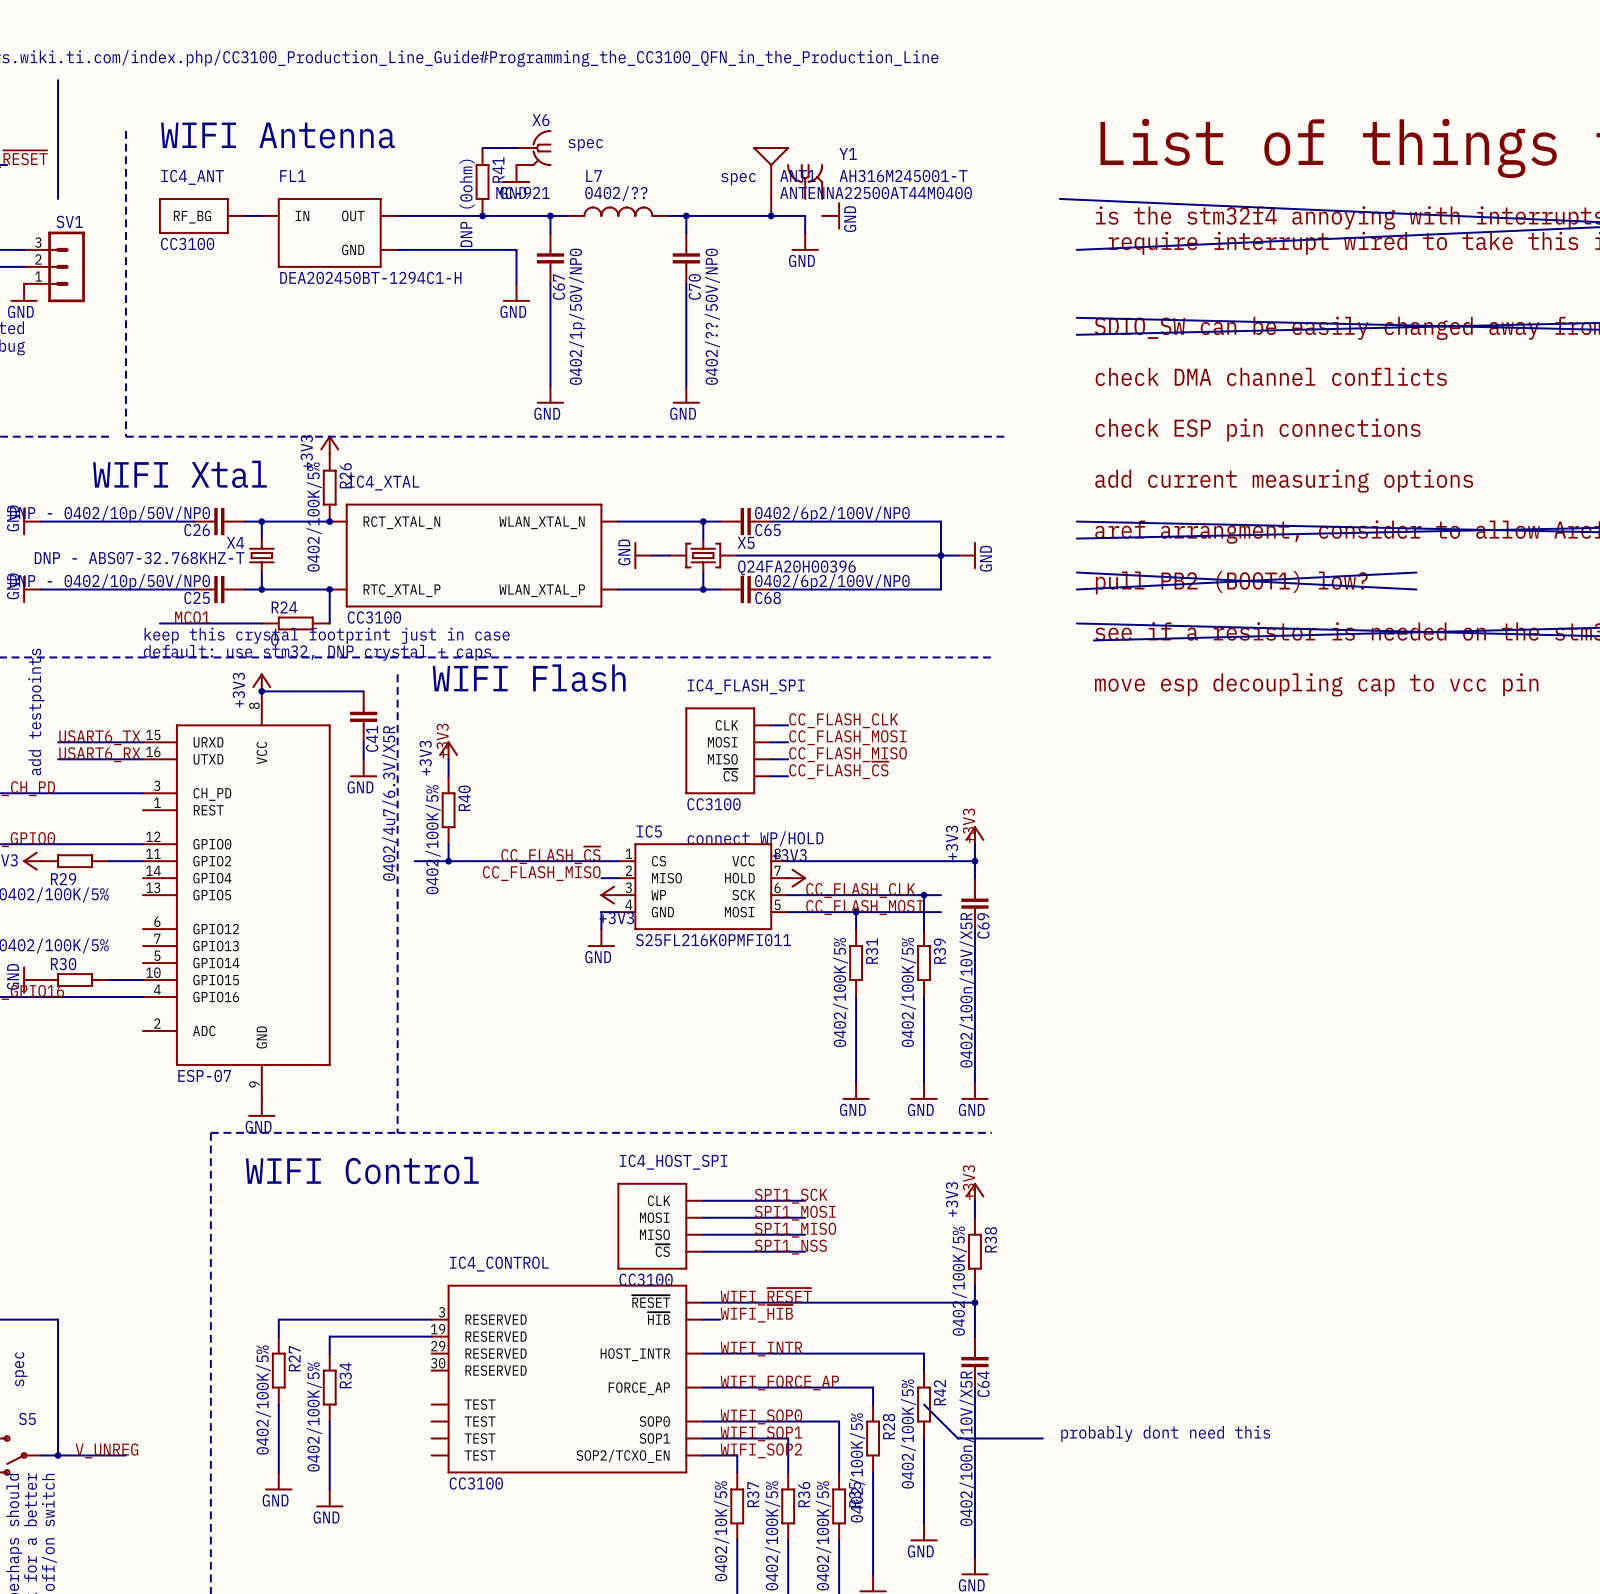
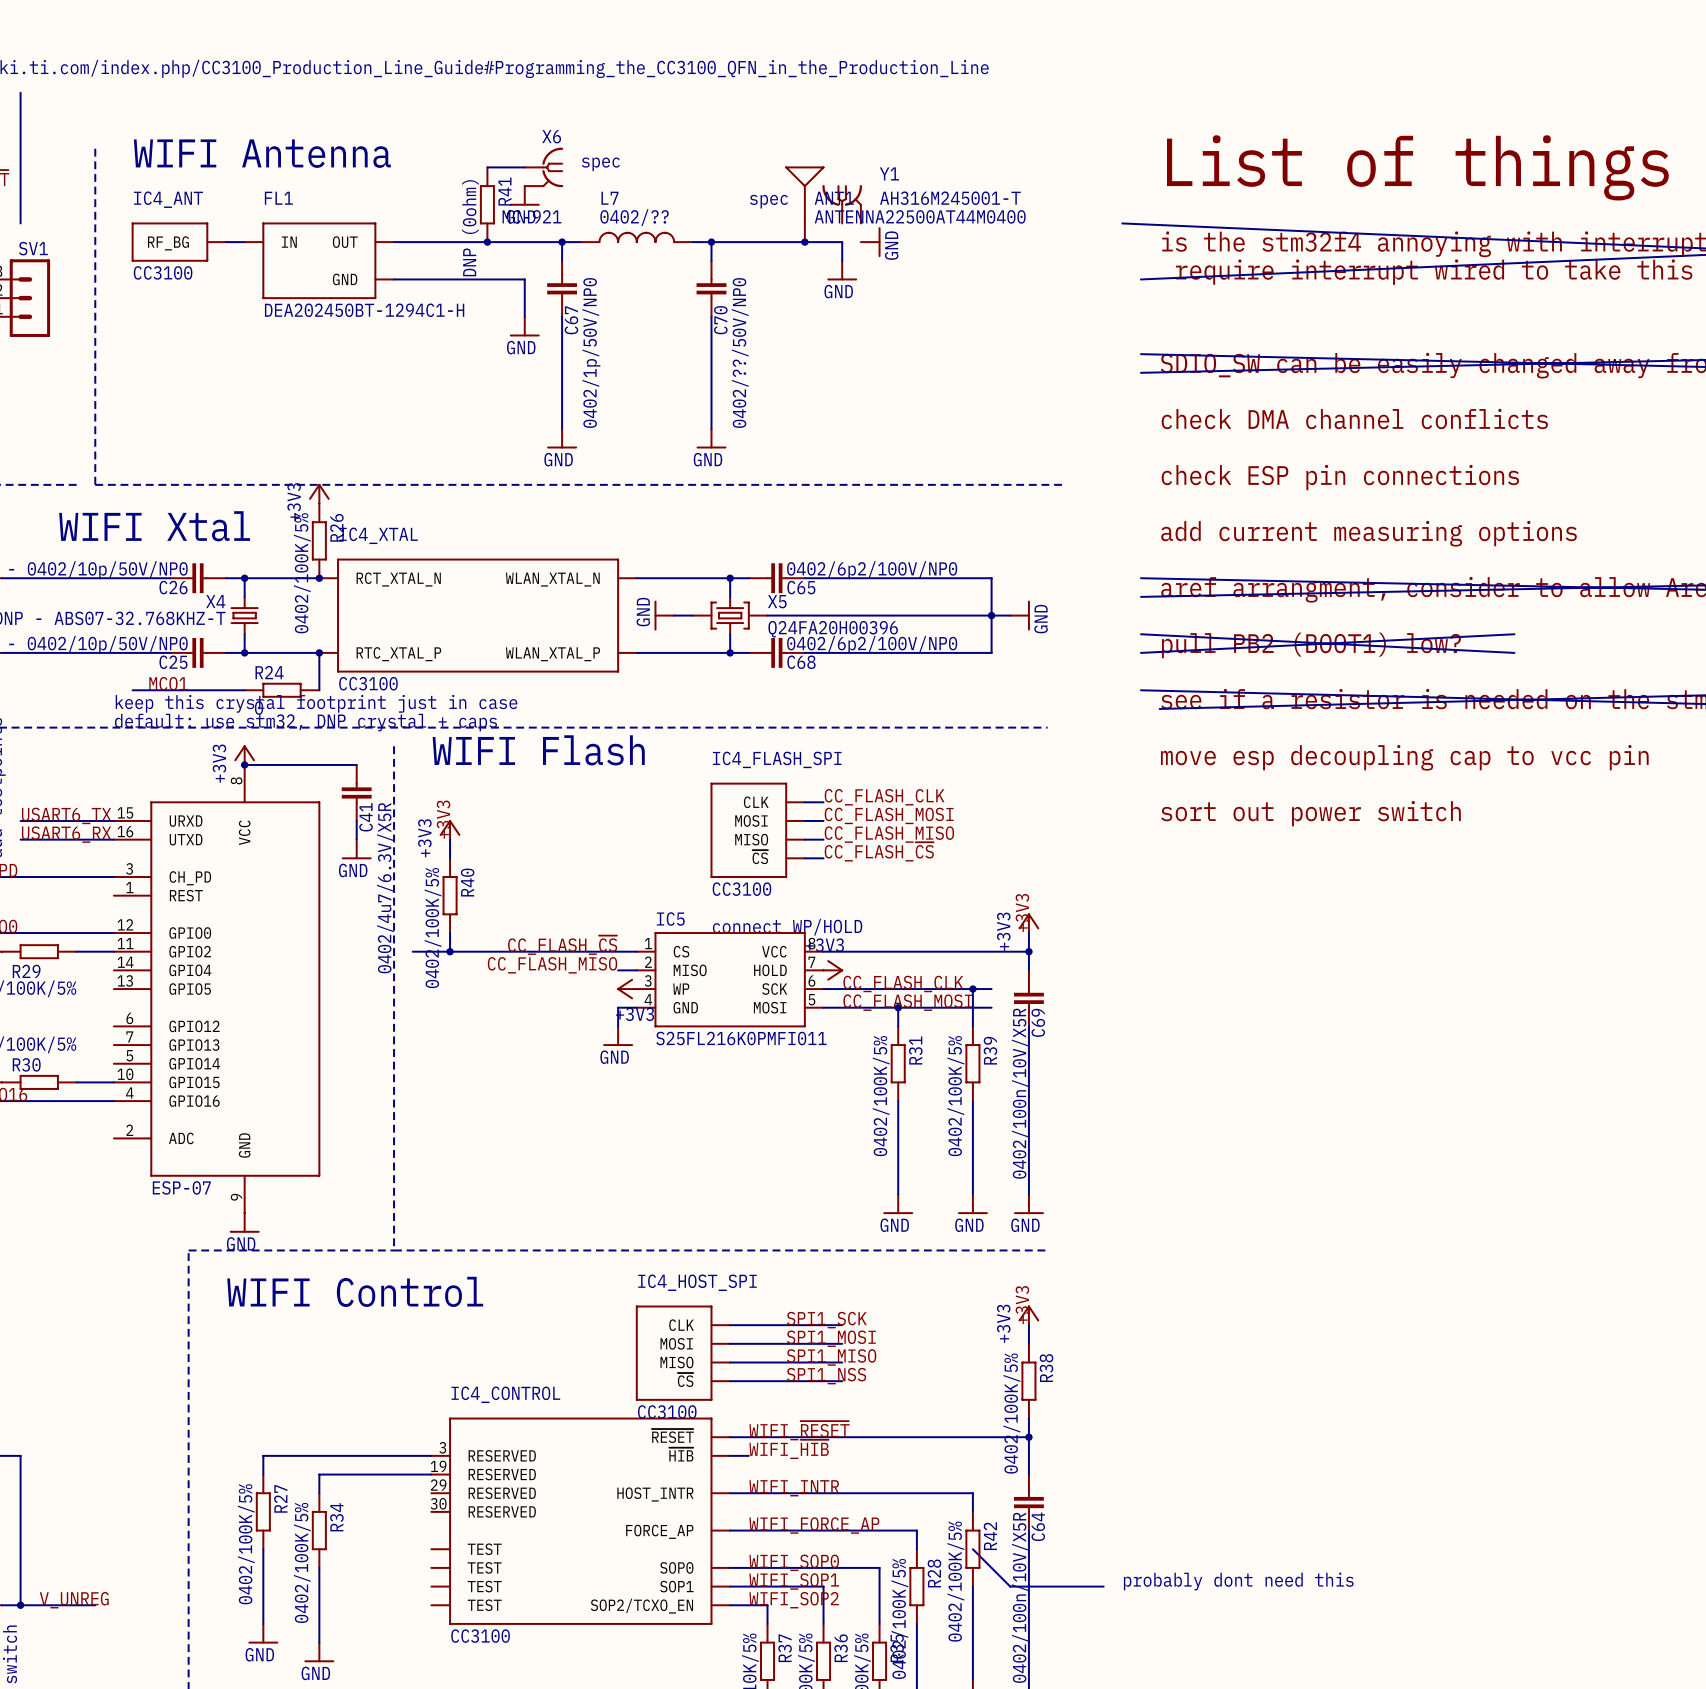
text: none -> sort out power switch (1311, 813)

